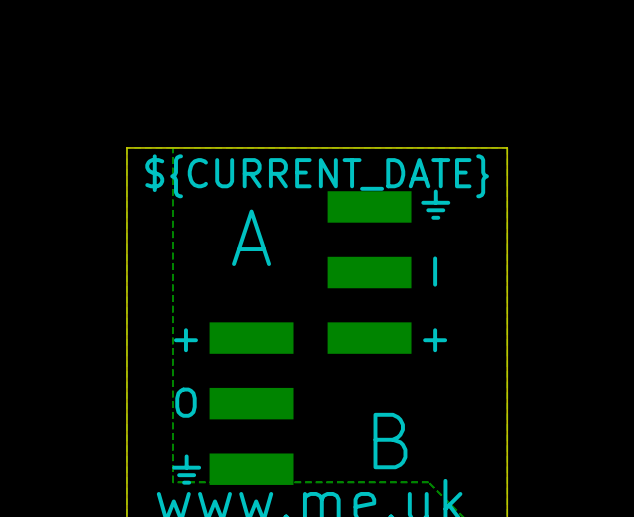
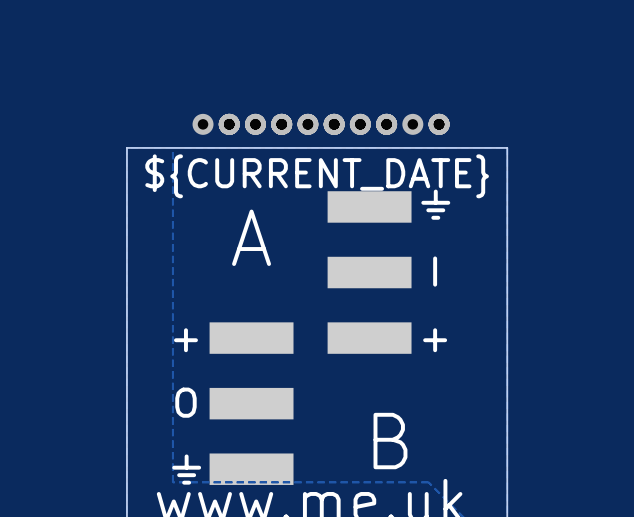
via: none -> (203, 124)
via: none -> (229, 124)
via: none -> (255, 124)
via: none -> (281, 124)
via: none -> (307, 124)
via: none -> (334, 124)
via: none -> (360, 124)
via: none -> (386, 124)
via: none -> (412, 124)
via: none -> (439, 124)

